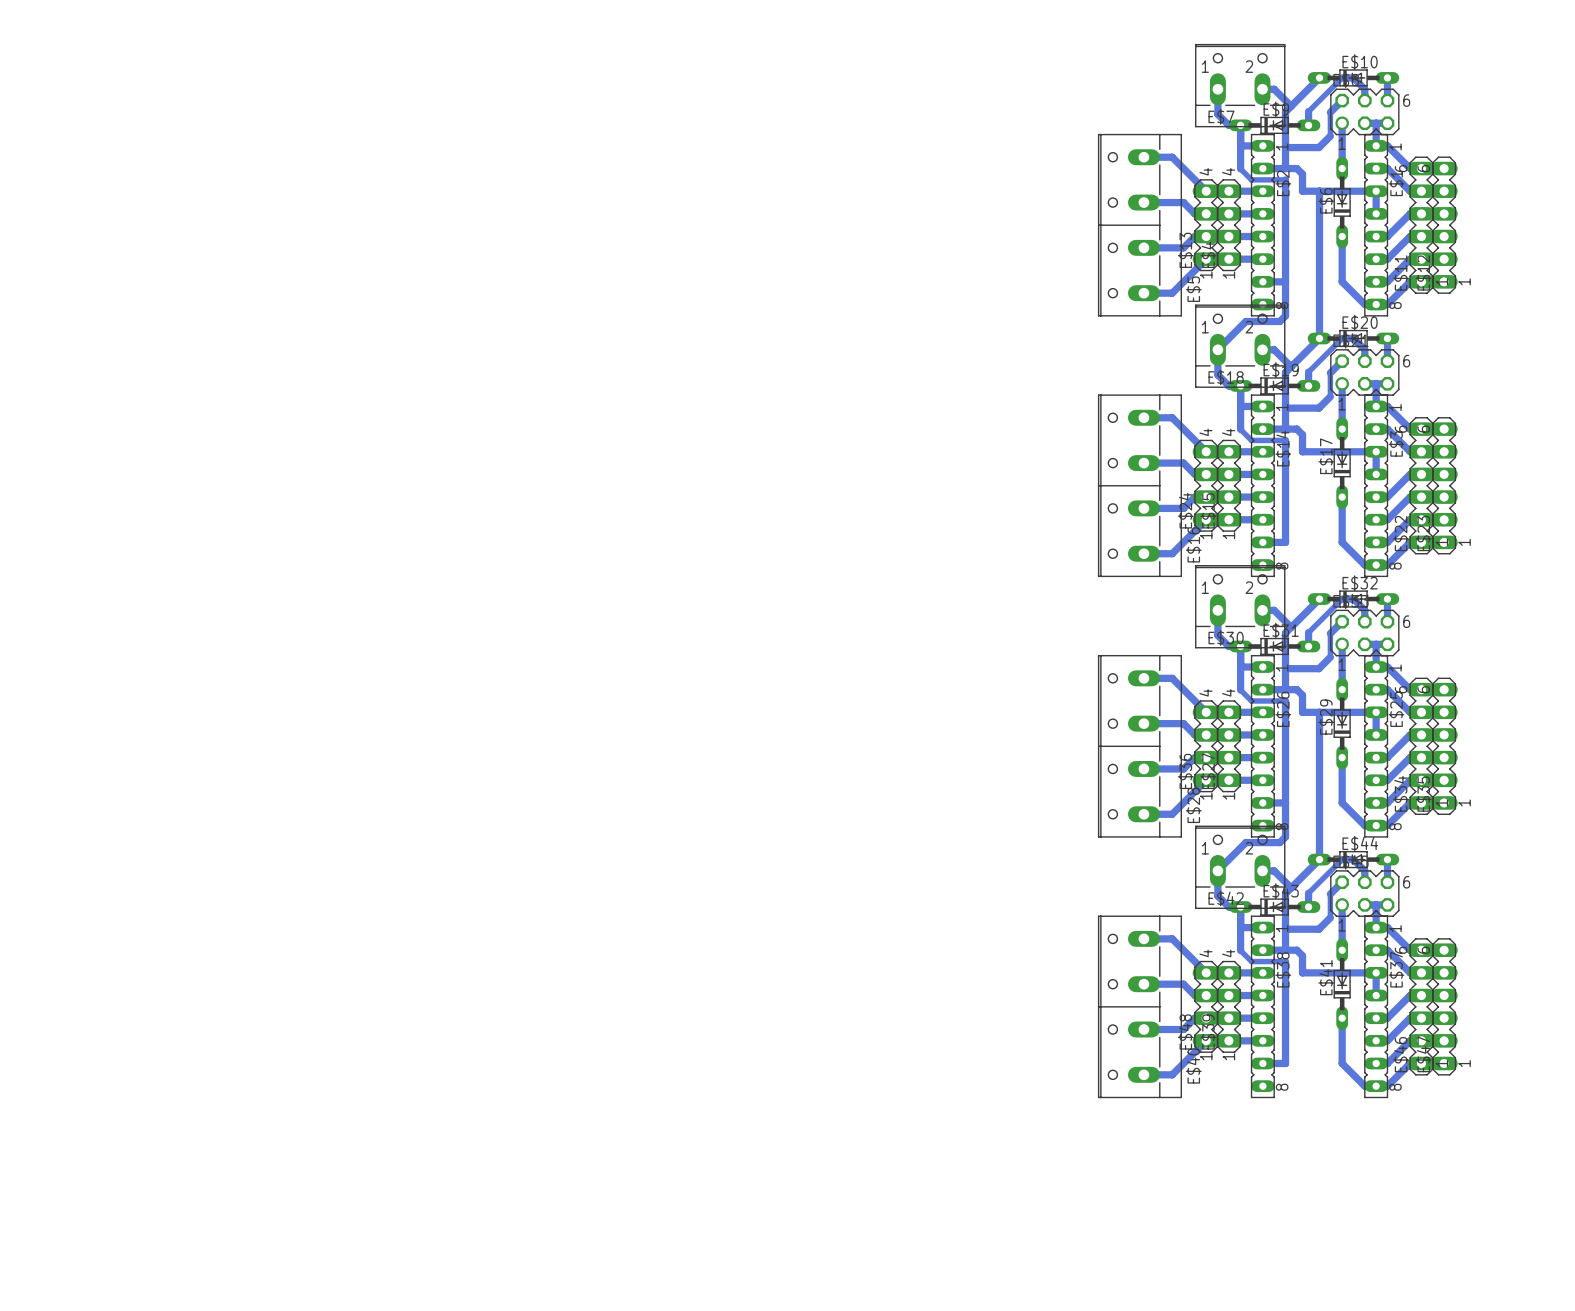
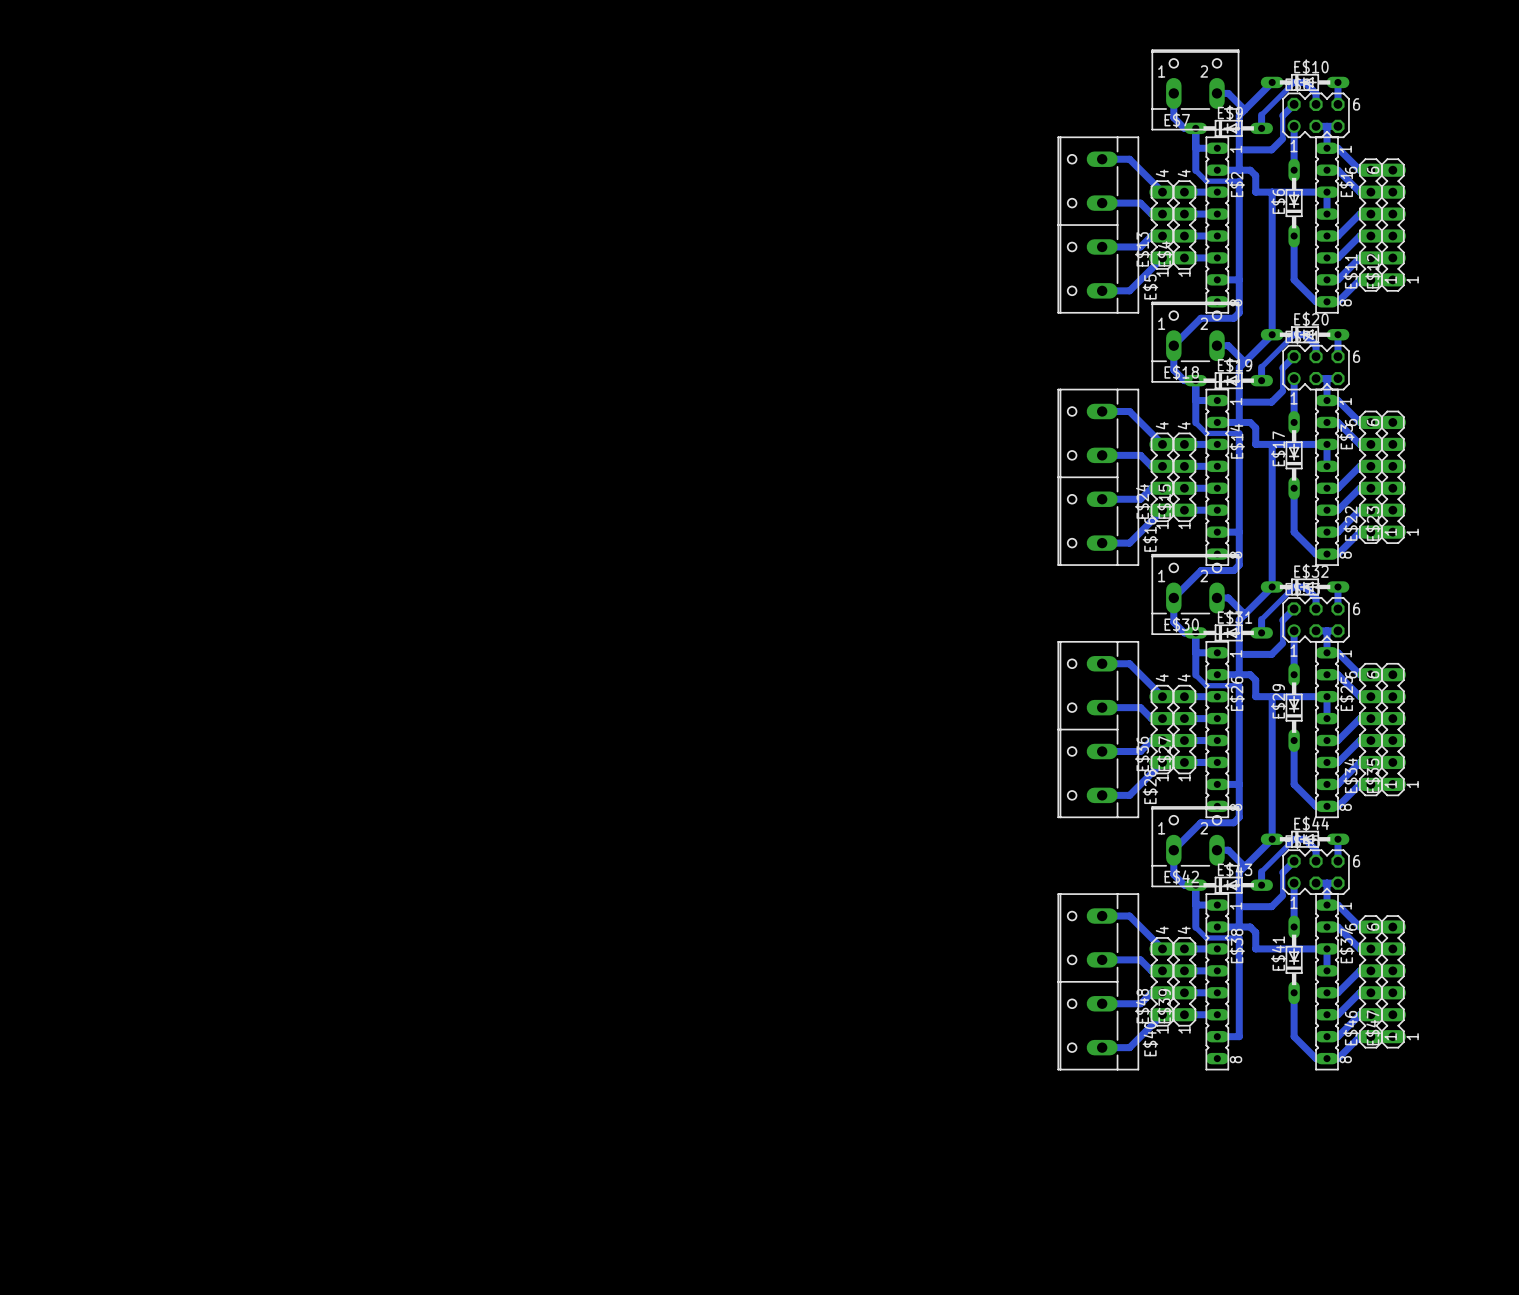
bottom track: none -> (1272, 444) (1272, 586)
bottom track: none -> (1239, 532) (1239, 565) (1233, 570) (1201, 570) (1173, 597)

